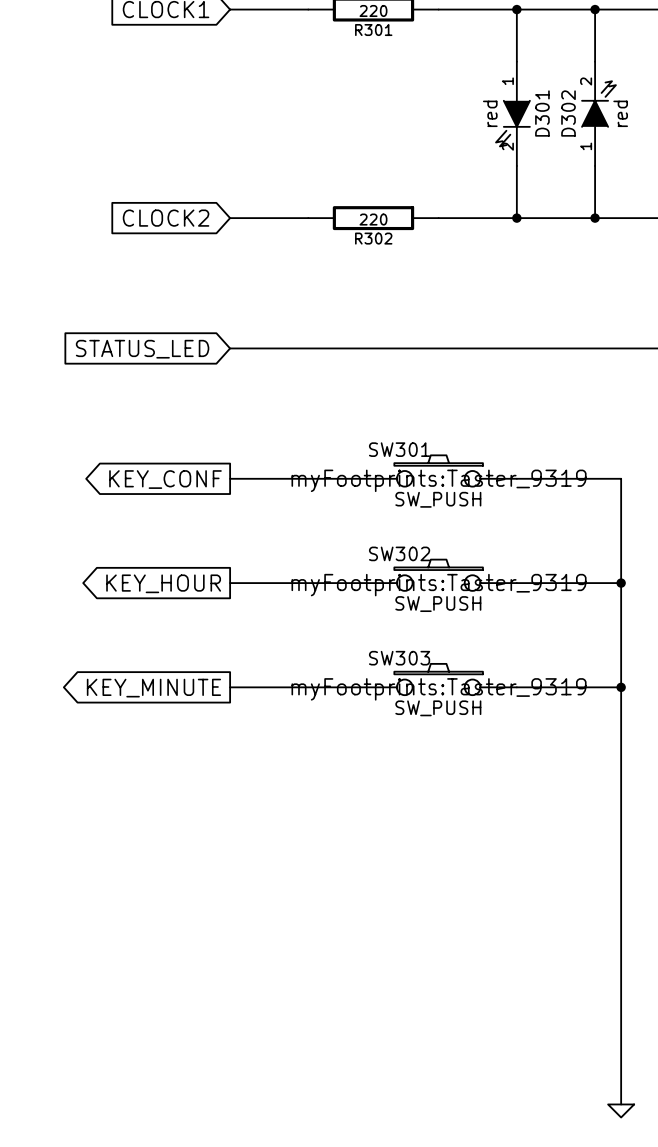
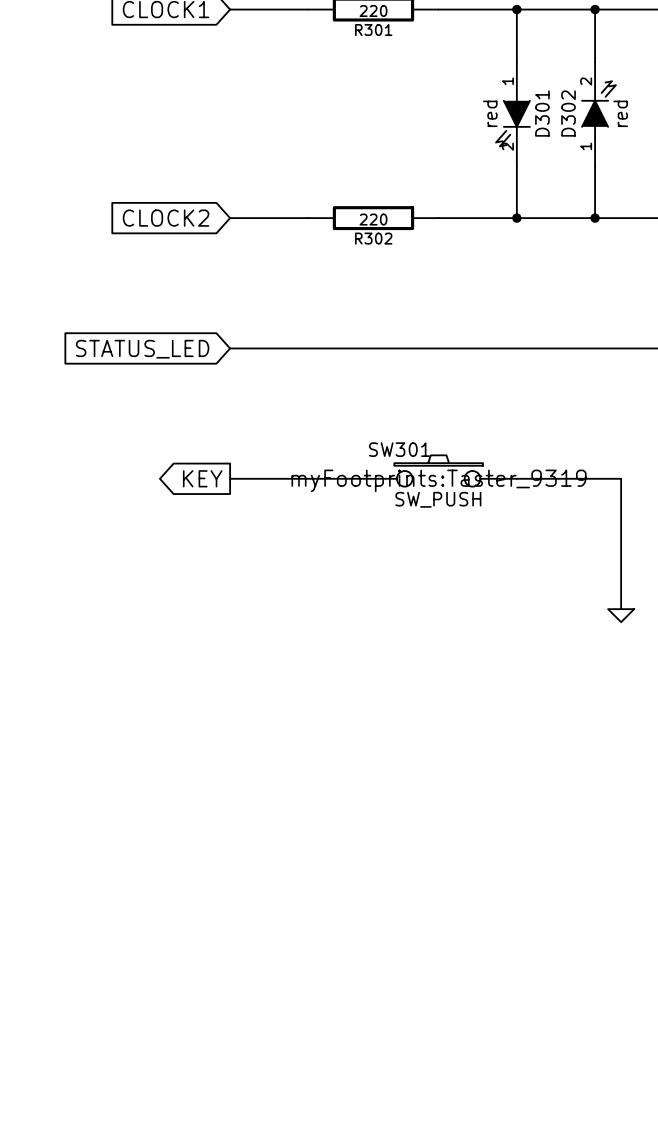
global label: KEY_CONF (165, 479) -> KEY (202, 478)
SW302: SW_PUSH (438, 575) -> none
global label: KEY_HOUR (163, 583) -> none
wire: (230, 583) (360, 583) -> none
wire: (516, 583) (621, 583) -> none
junction: (621, 583) -> none
wire: (621, 609) (621, 1104) -> none
power symbol: none -> (621, 615)
SW303: SW_PUSH (438, 679) -> none
wire: (230, 687) (360, 687) -> none
wire: (516, 687) (621, 687) -> none
junction: (621, 687) -> none
global label: KEY_MINUTE (153, 688) -> none
power symbol: (621, 1110) -> none

